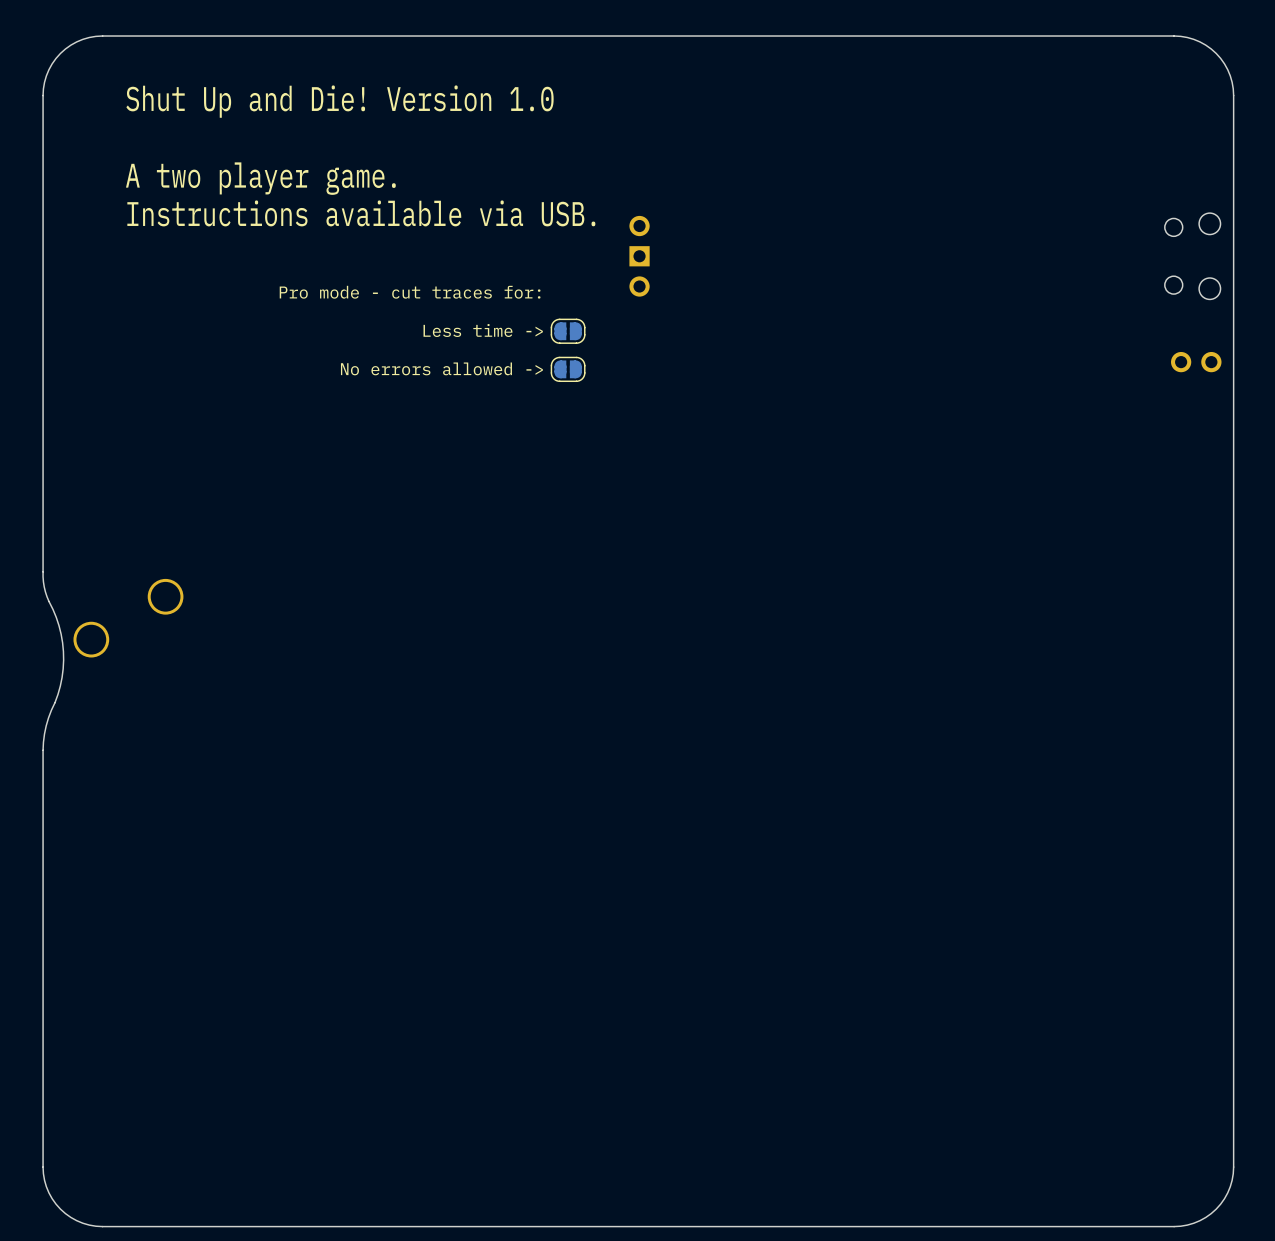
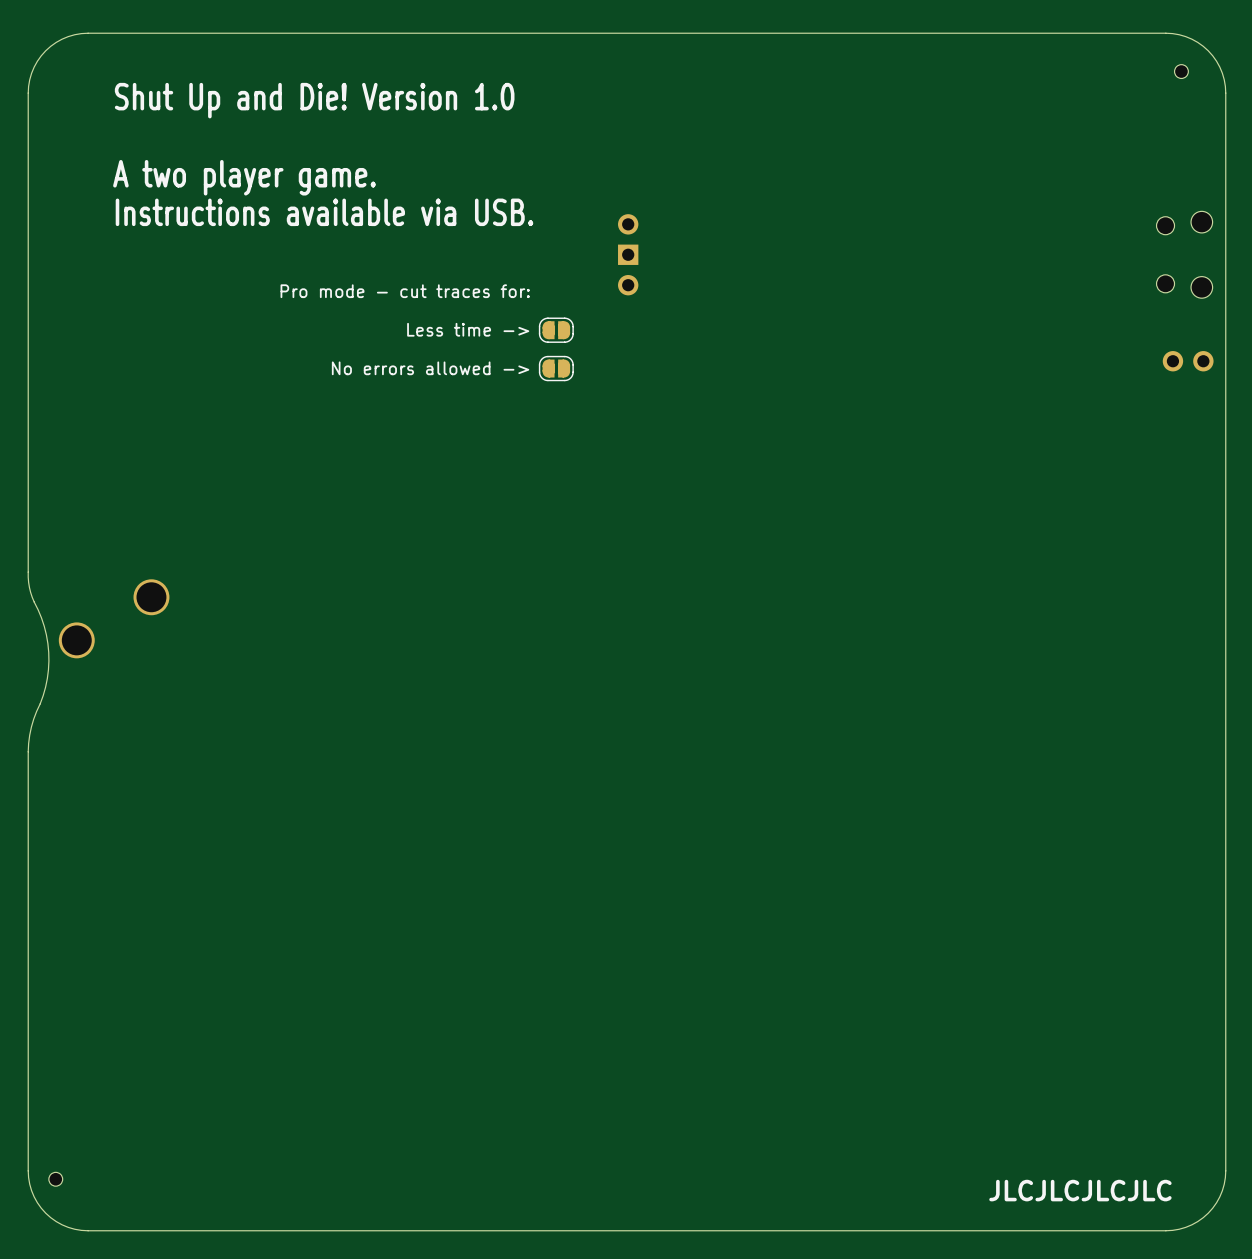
part: none -> (1181, 71)
part: none -> (55, 1179)
text: none -> JLCJLCJLCJLC (1080, 1190)

